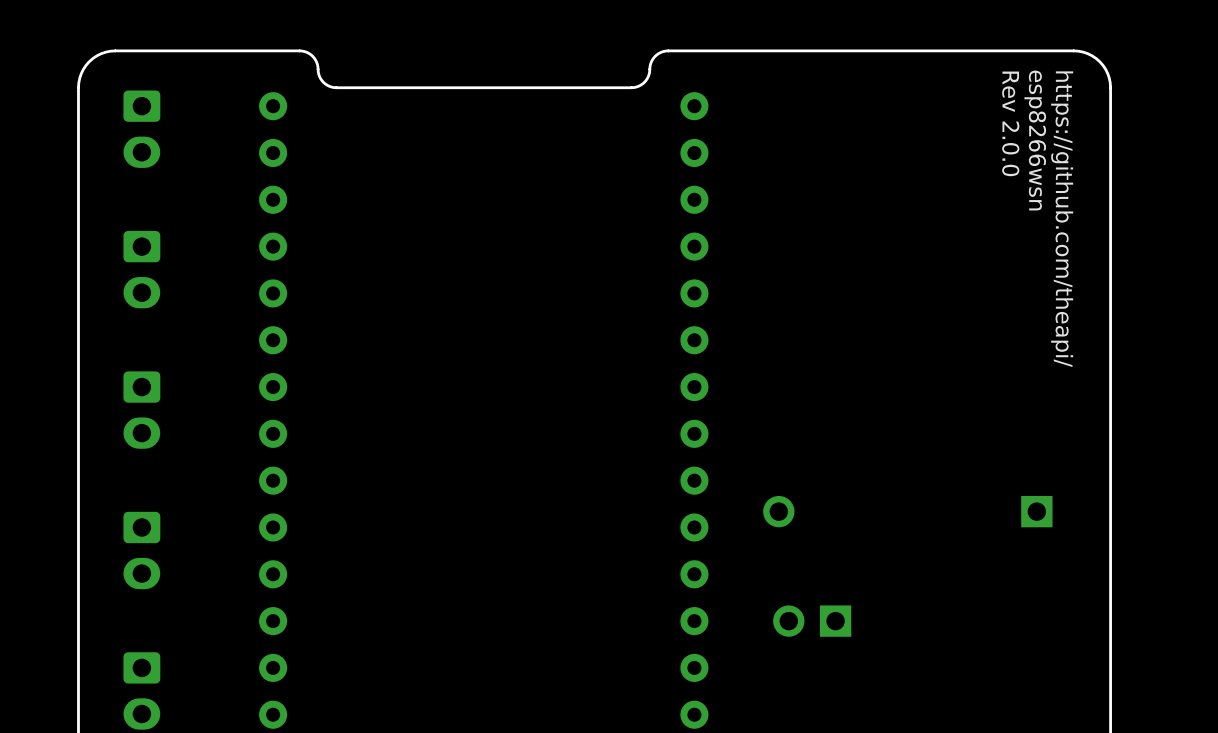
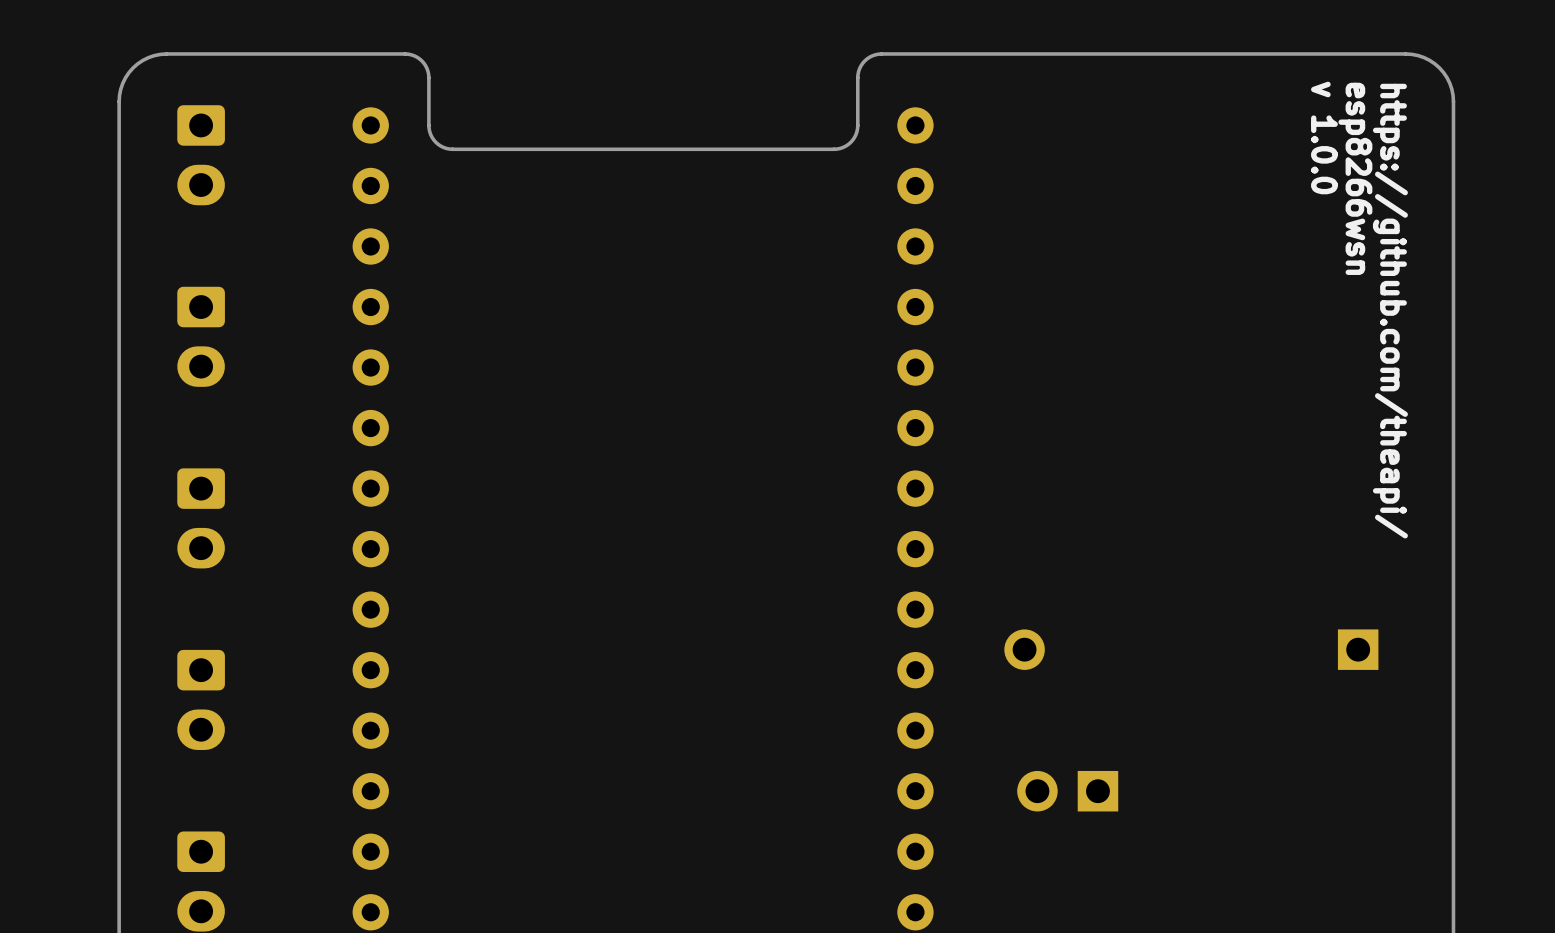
board edge: (649, 69) (644, 82) (631, 87) (336, 87) (323, 82) (318, 69) -> (857, 77) (856, 131) (848, 144) (833, 149) (449, 149) (435, 142) (429, 131) (428, 77)
text: Rev 2.0.0 (1010, 123) -> v 1.0.0 (1324, 138)

